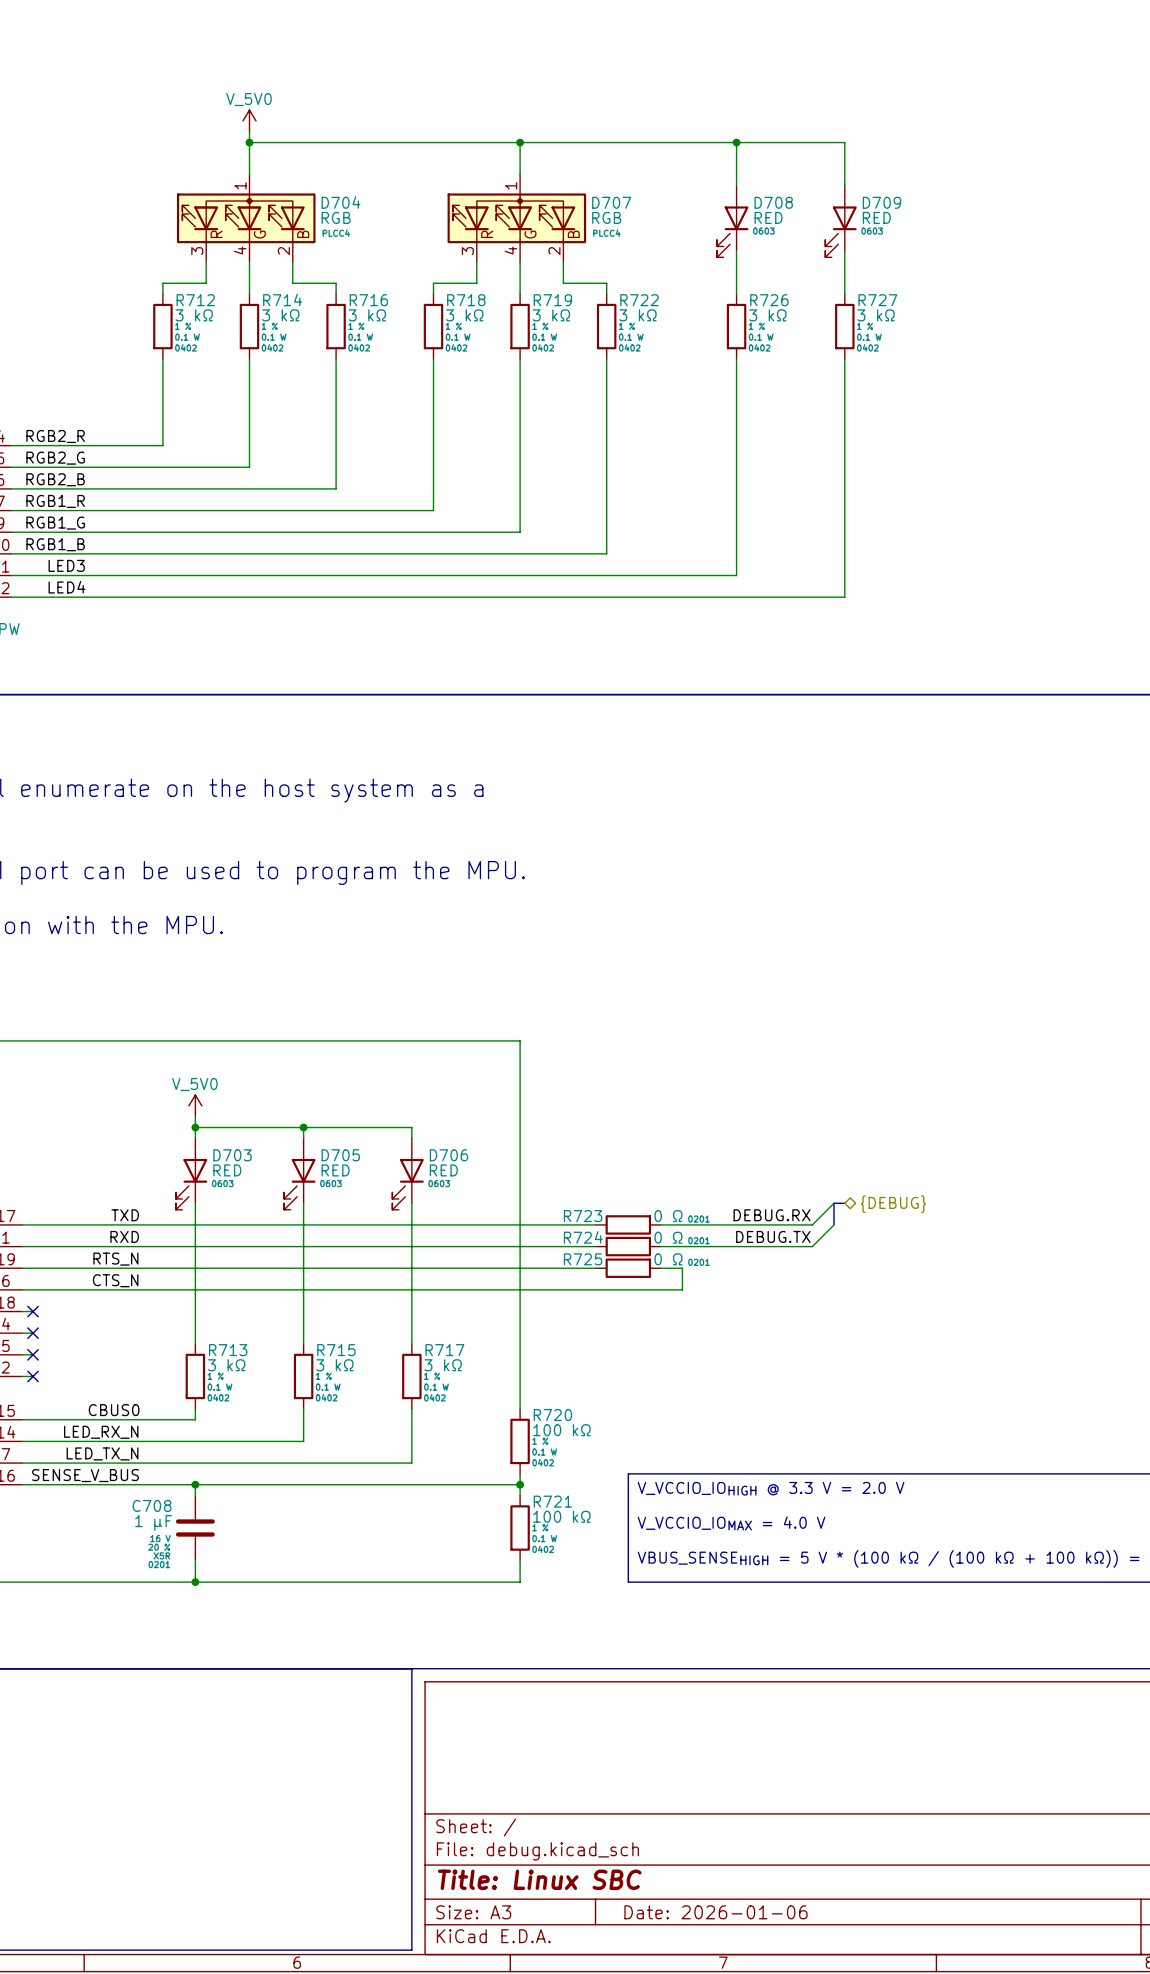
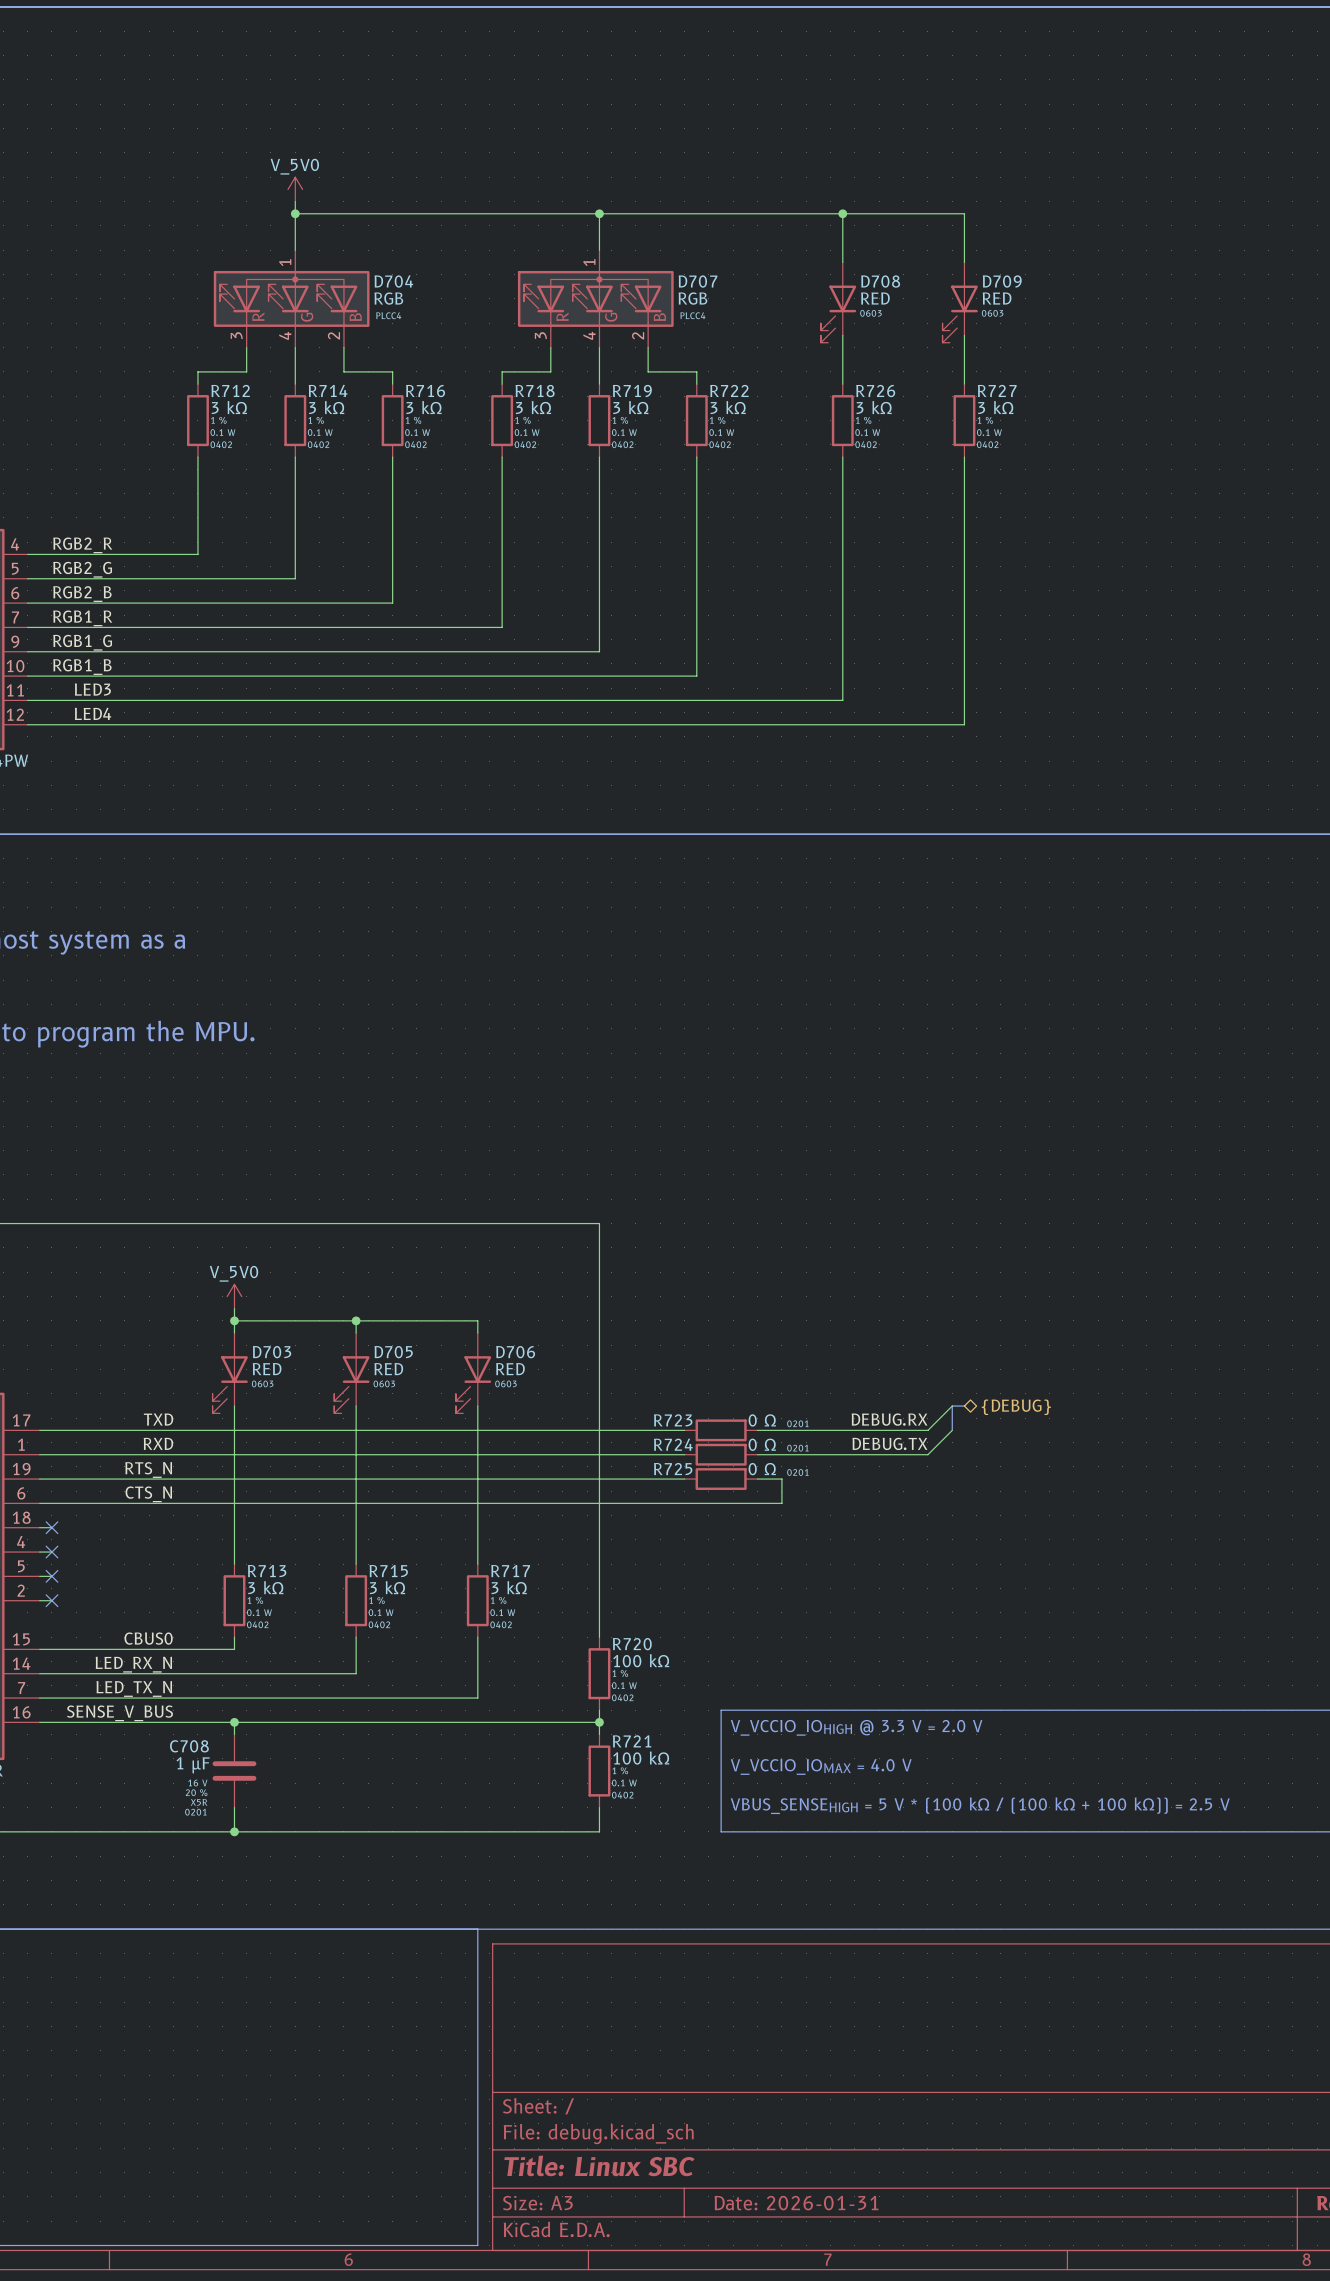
title block: Date: 2026-01-06 (715, 1912) -> Date: 2026-01-31 (796, 2203)

